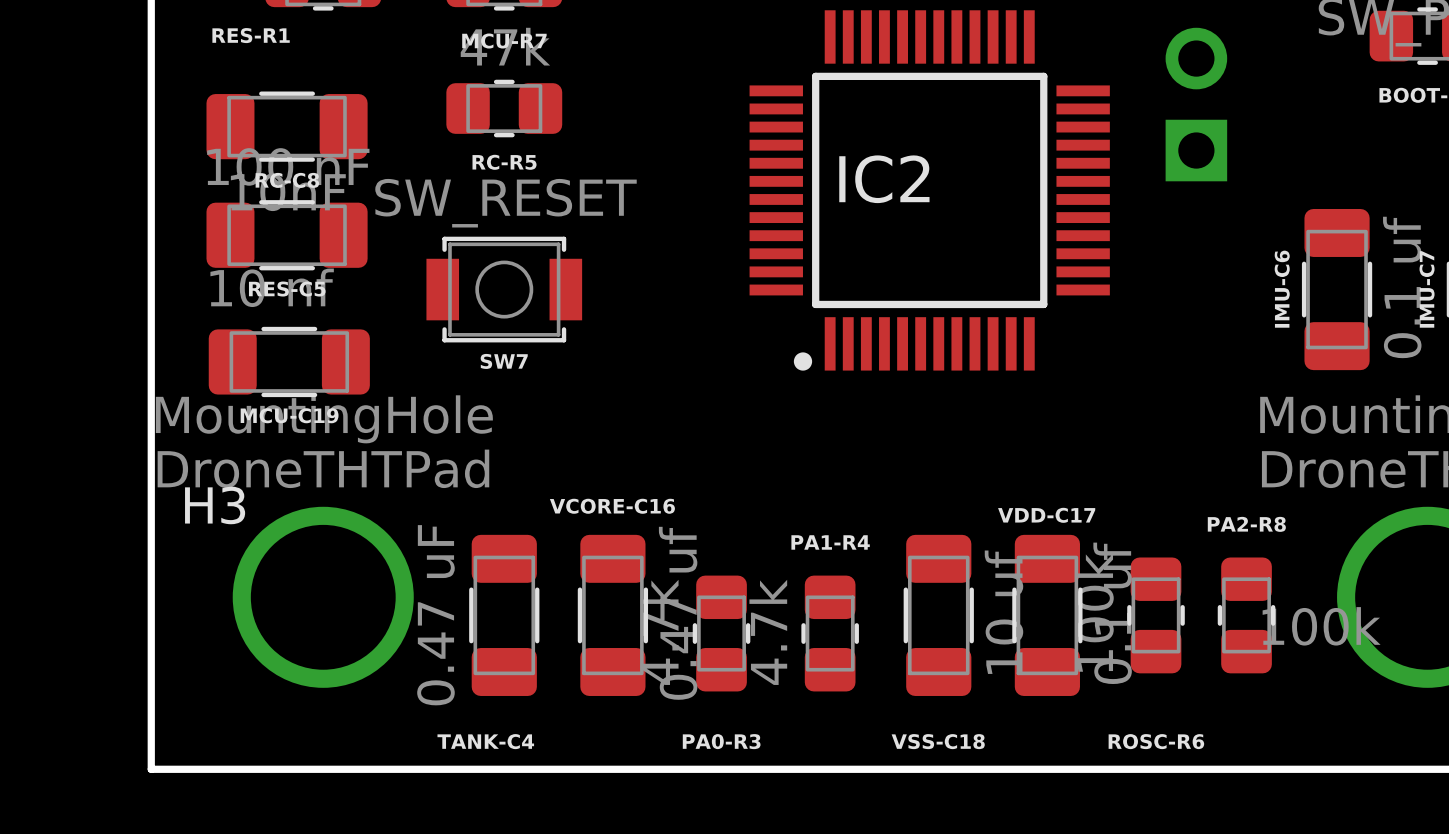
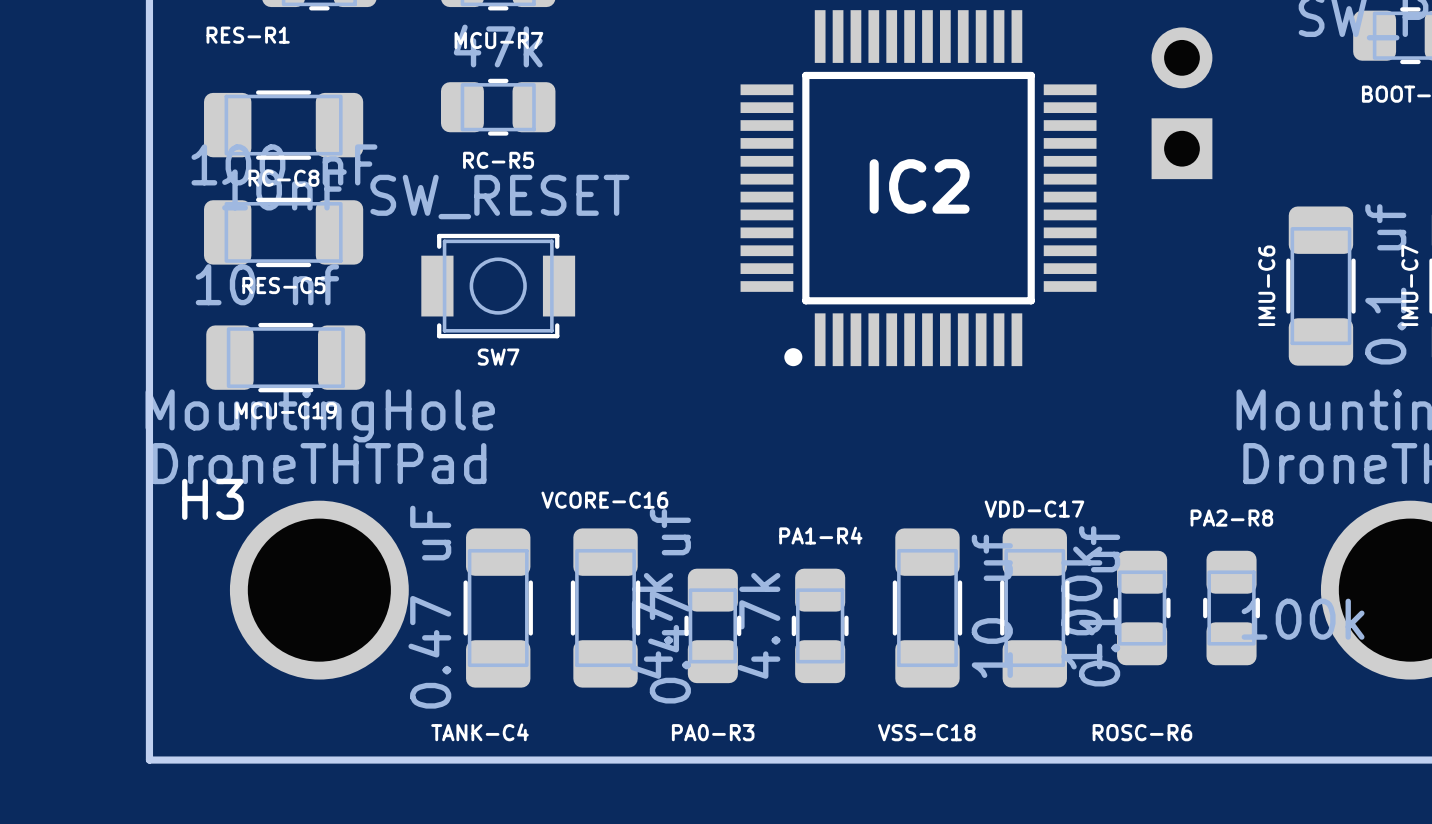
IC2 name position: IC2 (884, 179) -> IC2 (919, 186)

